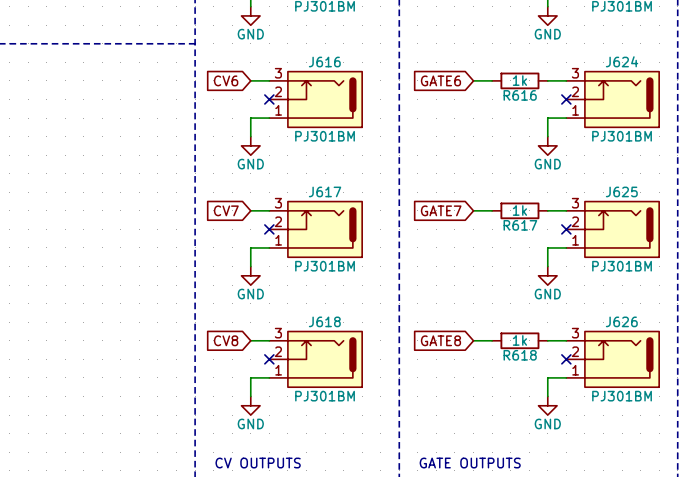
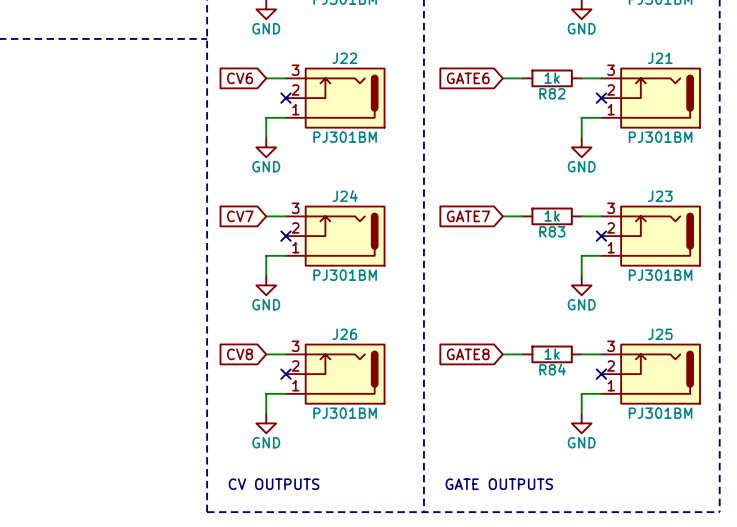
J624 name: J624 (622, 61) -> J21 (660, 58)
J616 name: J616 (324, 62) -> J22 (344, 58)
R616 name: R616 (520, 95) -> R82 (552, 93)
J617 name: J617 (325, 191) -> J24 (345, 196)
J625 name: J625 (621, 191) -> J23 (660, 196)
R617 name: R617 (520, 225) -> R83 (552, 231)
J618 name: J618 (324, 321) -> J26 (344, 334)
J626 name: J626 (621, 321) -> J25 (660, 334)
R618 name: R618 (520, 355) -> R84 (552, 369)

